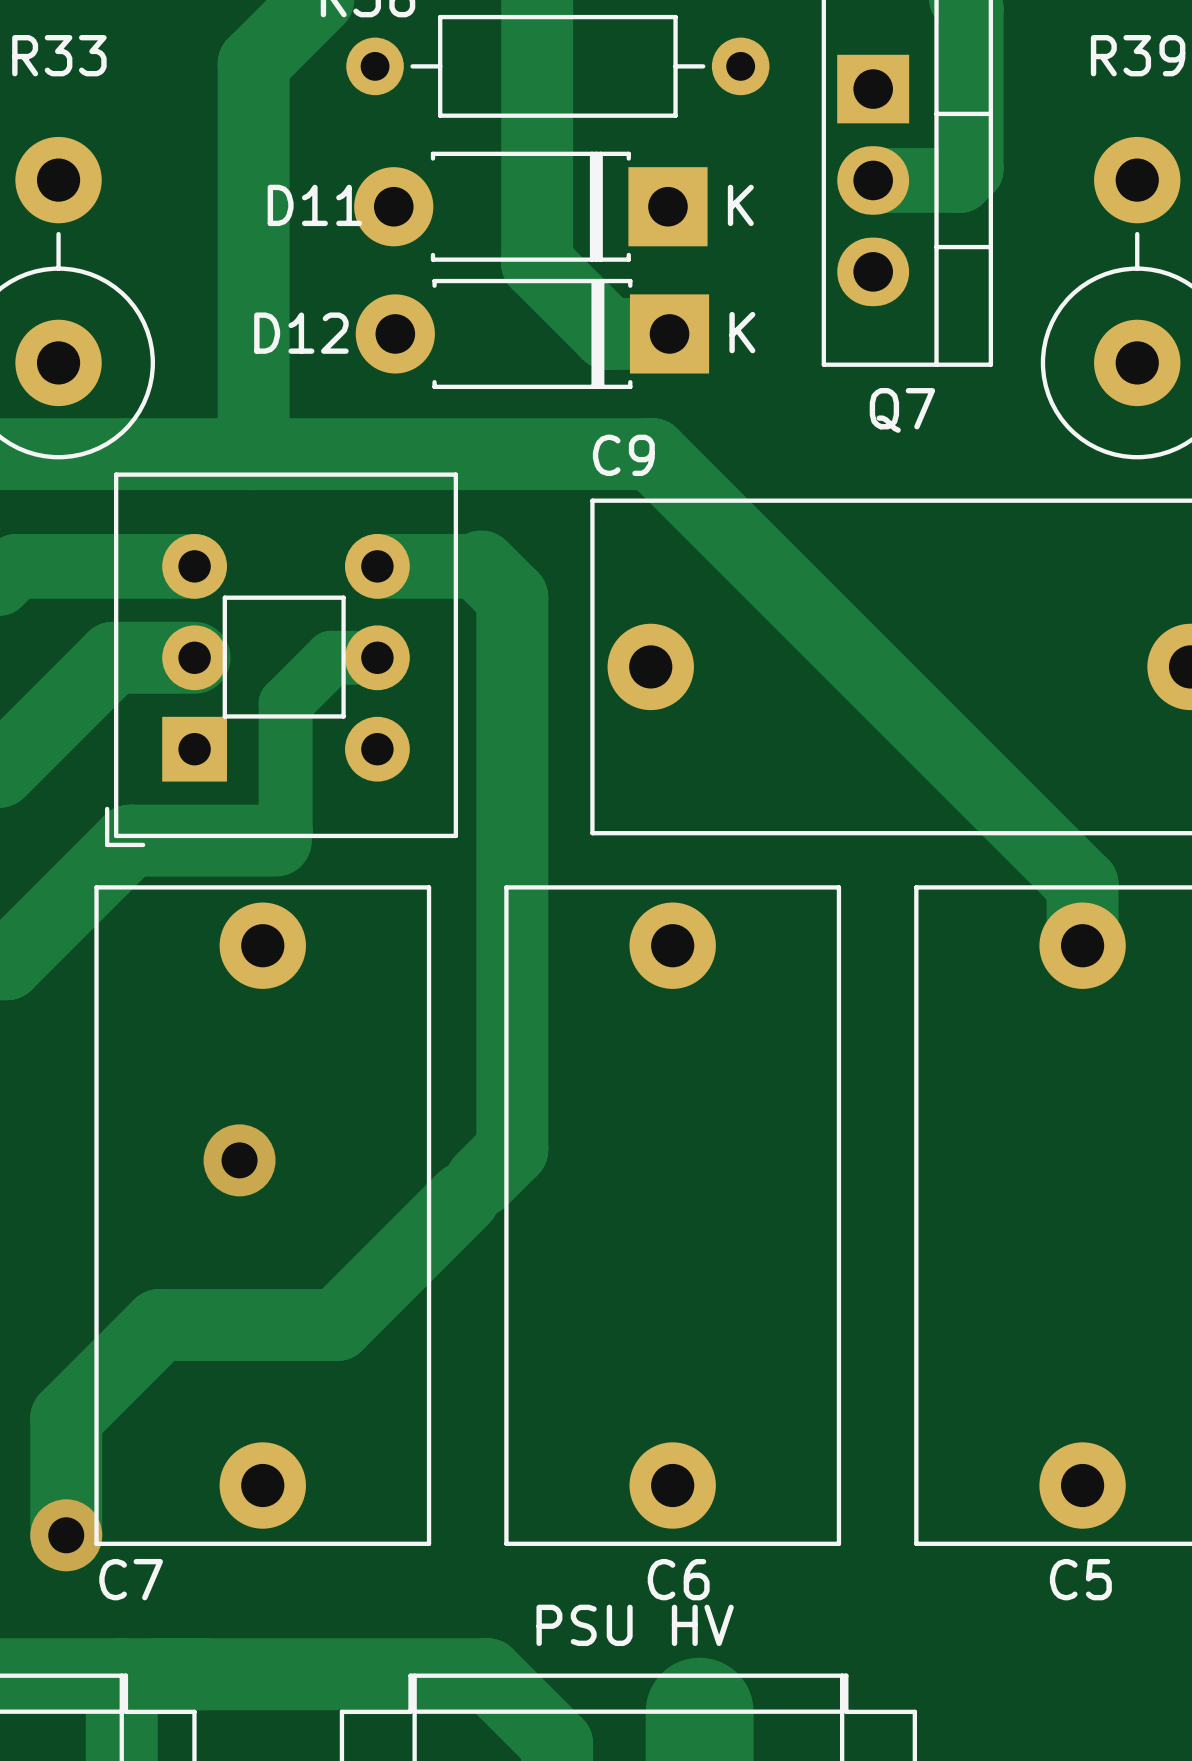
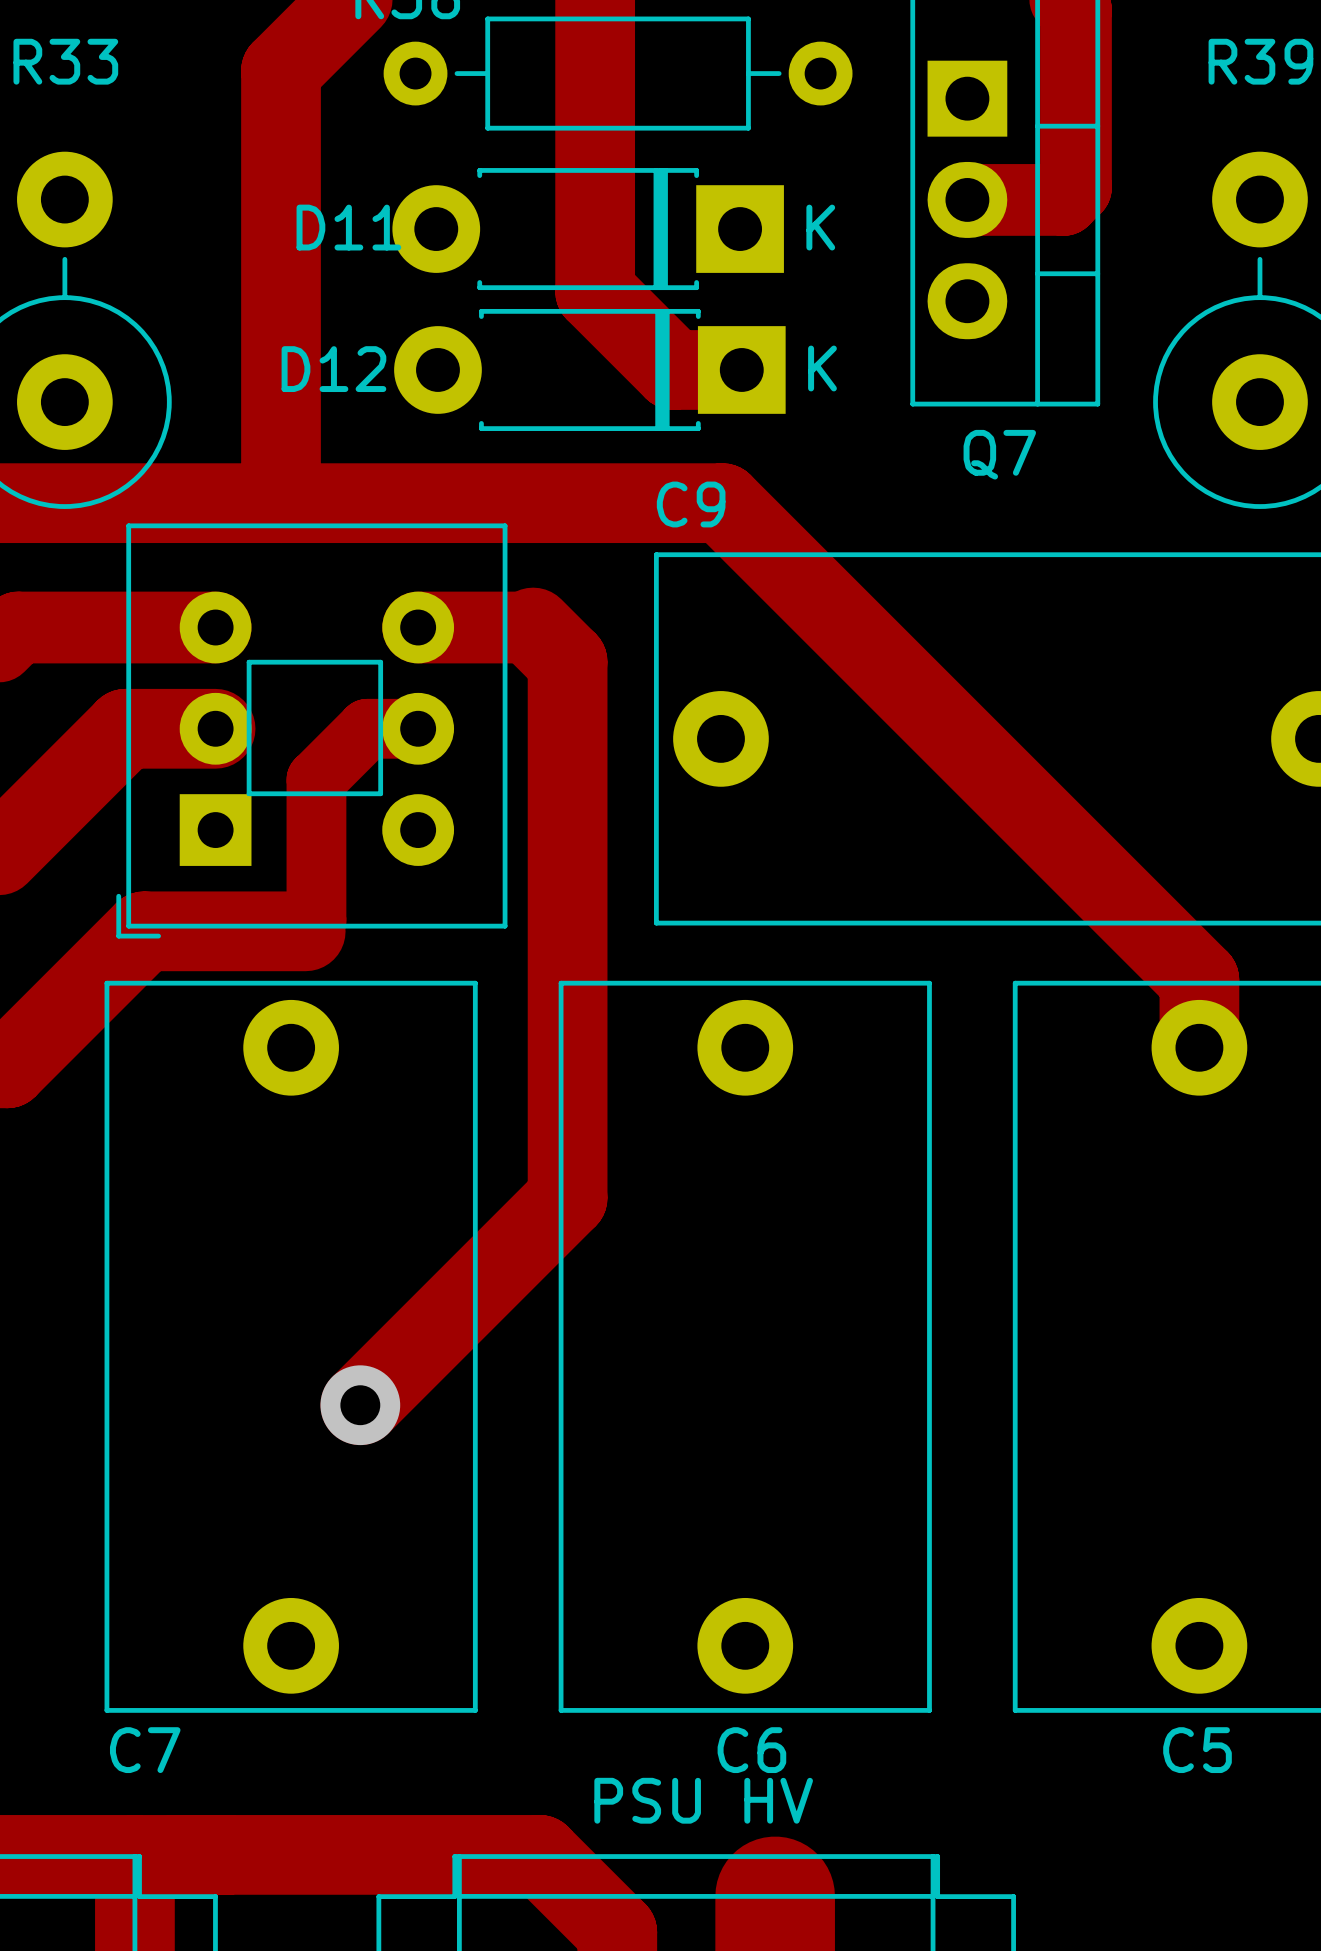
track: (512, 1081) (512, 1149) (336, 1325) (159, 1325) (66, 1418) (66, 1535) -> (567, 1197) (360, 1405)
via position: (239, 1160) -> (360, 1405)
via: (66, 1535) -> none

